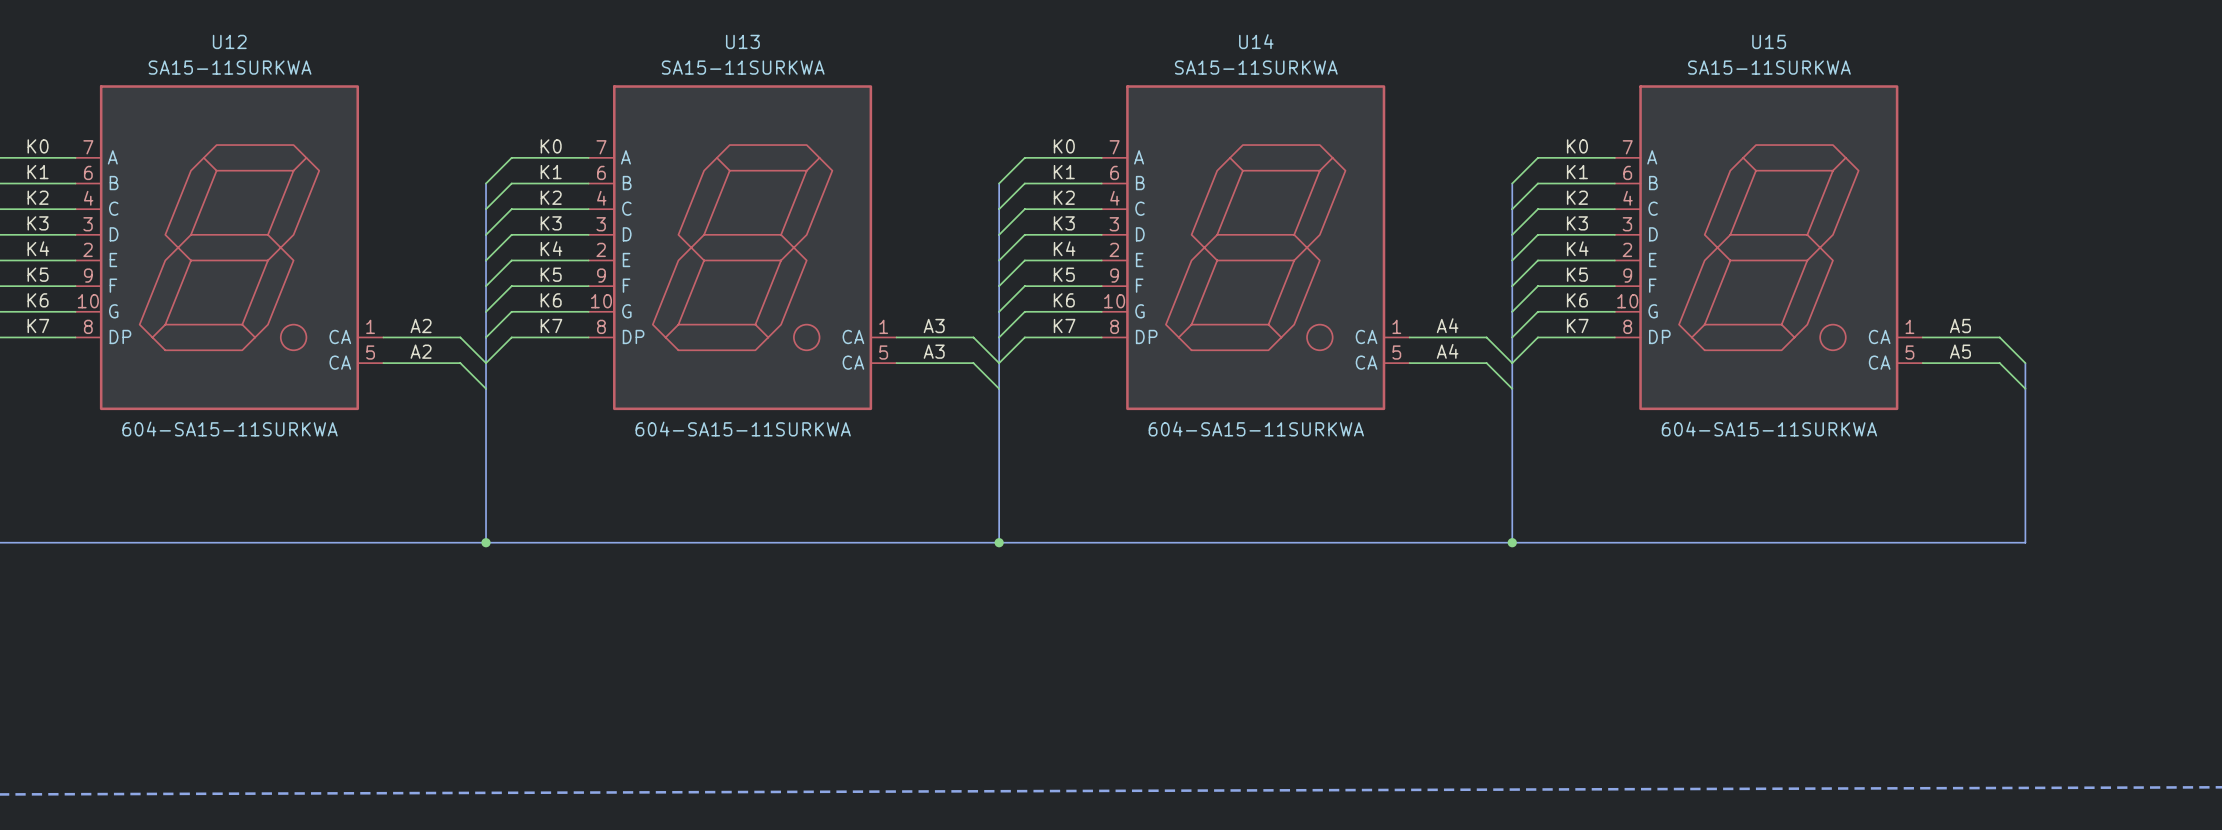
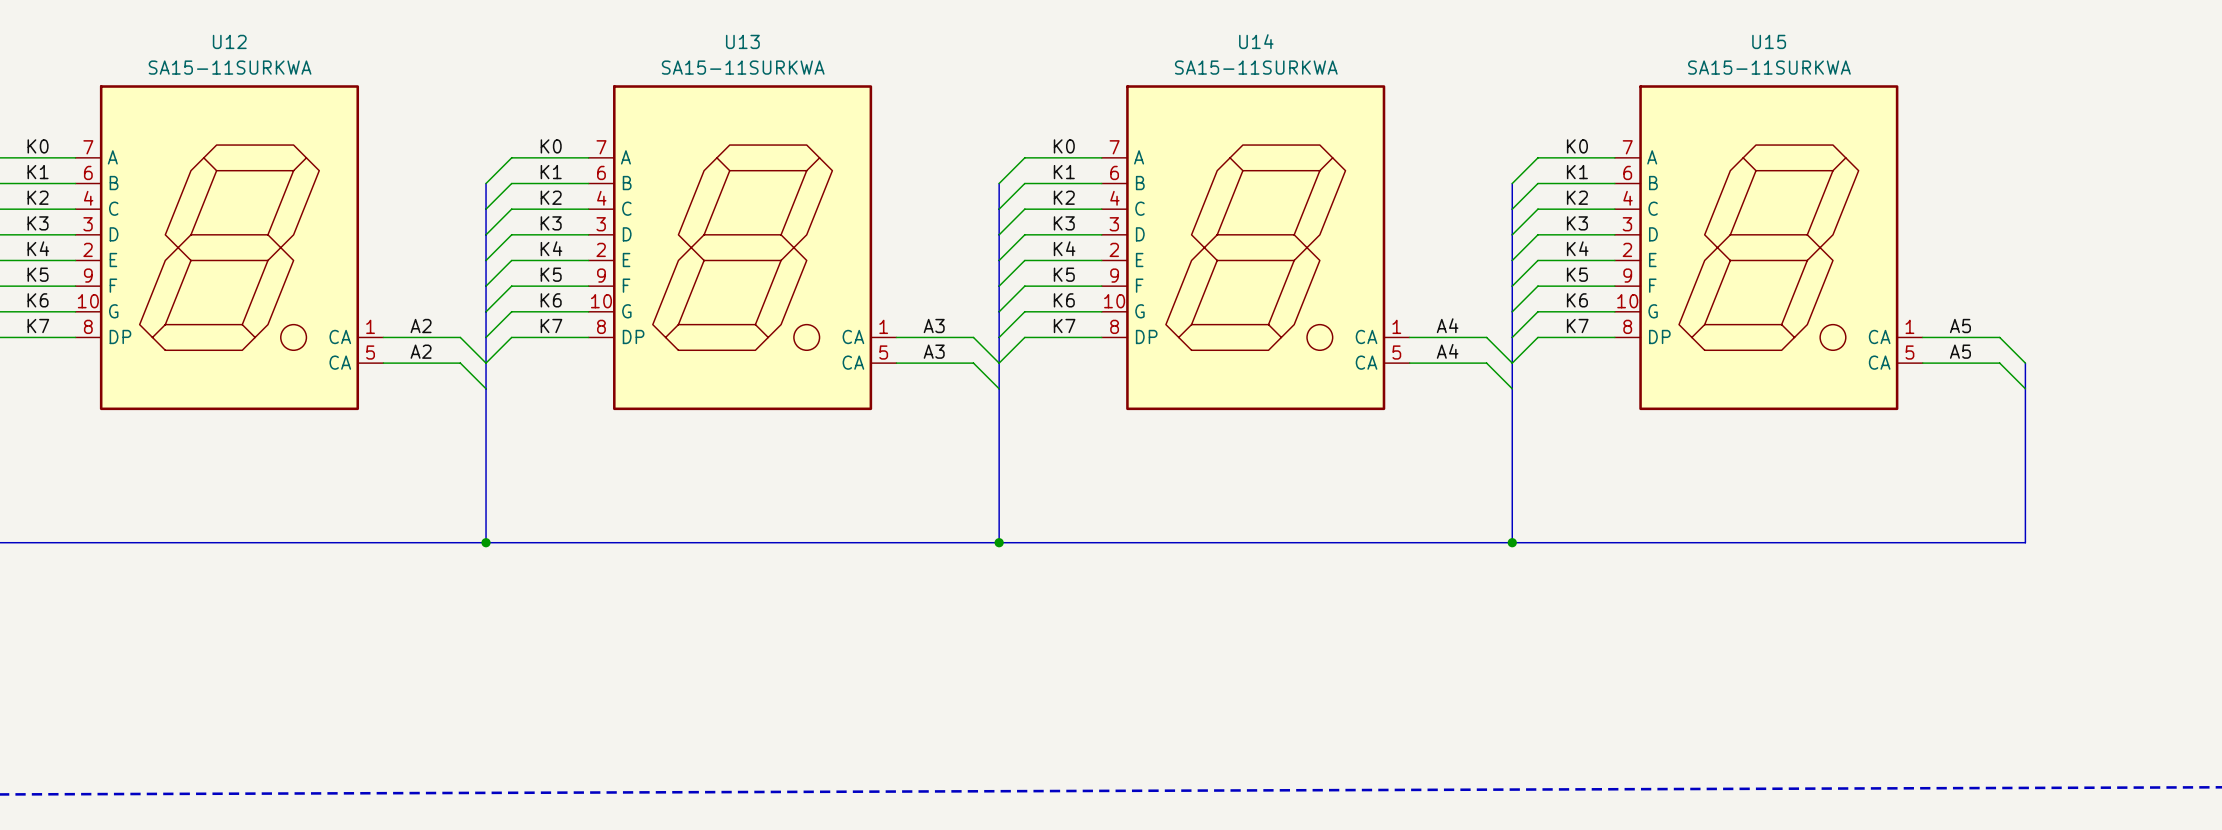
U12 text: 604-SA15-11SURKWA (230, 429) -> none
U13 text: 604-SA15-11SURKWA (743, 429) -> none
U14 text: 604-SA15-11SURKWA (1256, 429) -> none
U15 text: 604-SA15-11SURKWA (1769, 429) -> none

